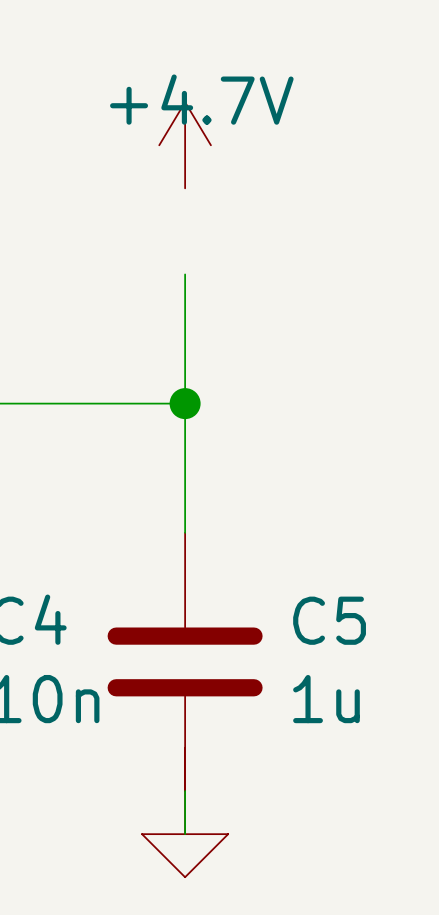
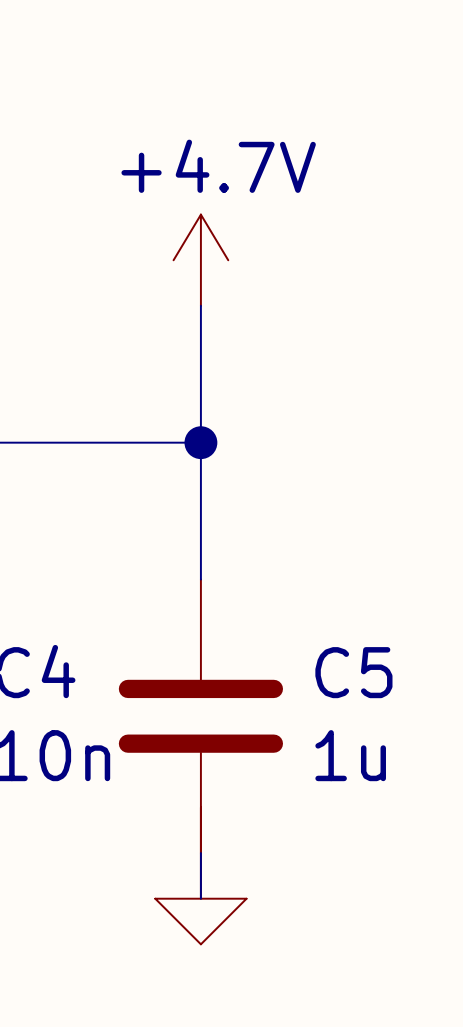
power symbol text position: +4.7V (201, 99) -> +4.7V (218, 166)
power symbol position: +4.7V (185, 145) -> +4.7V (200, 260)

